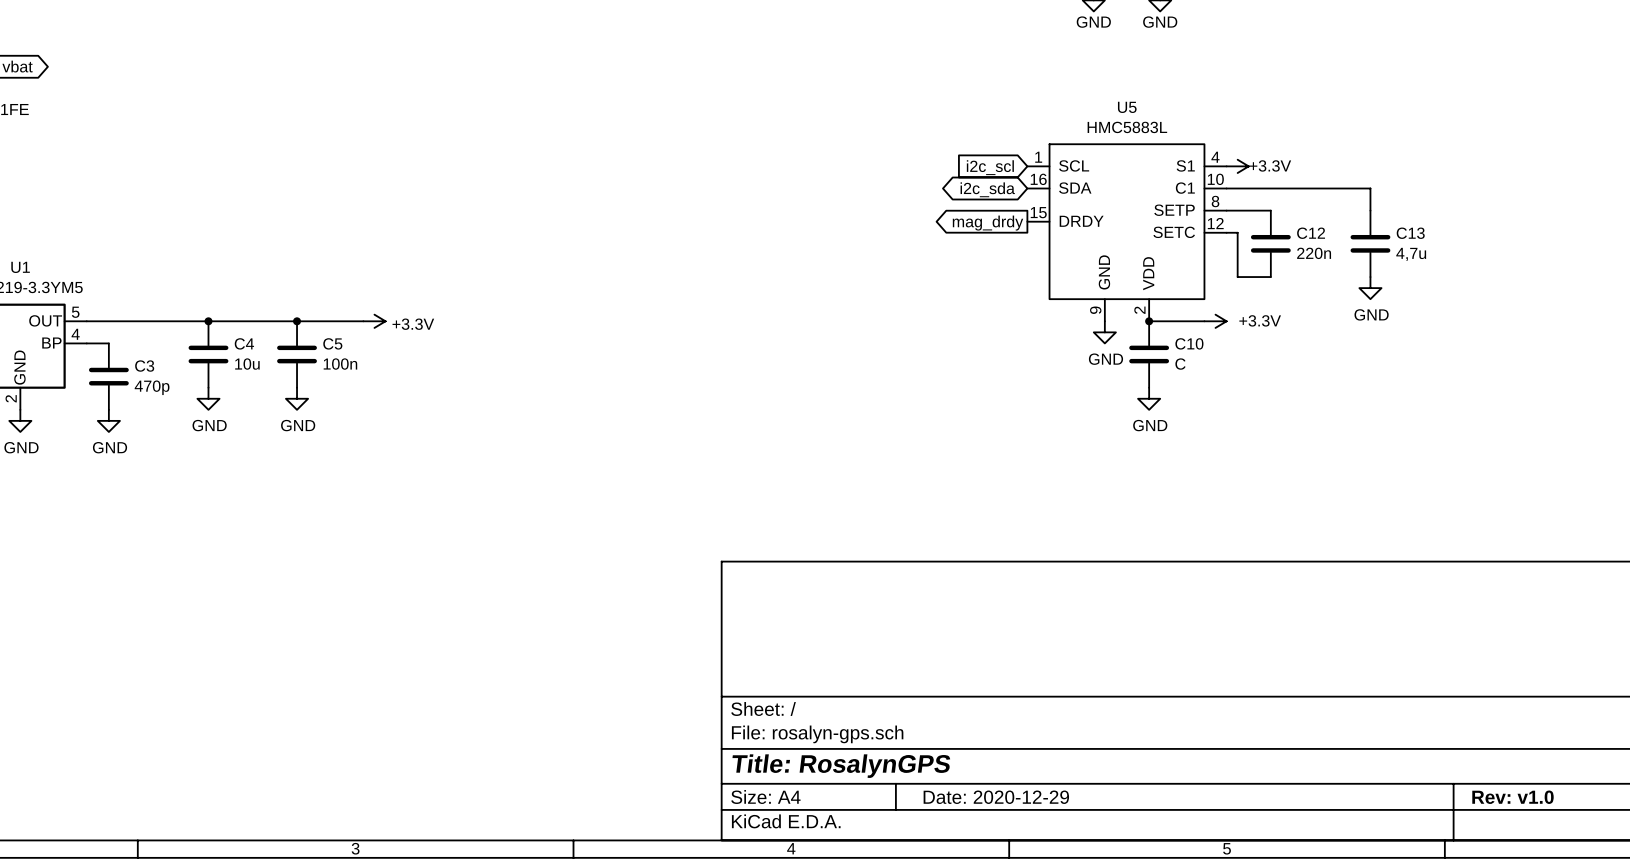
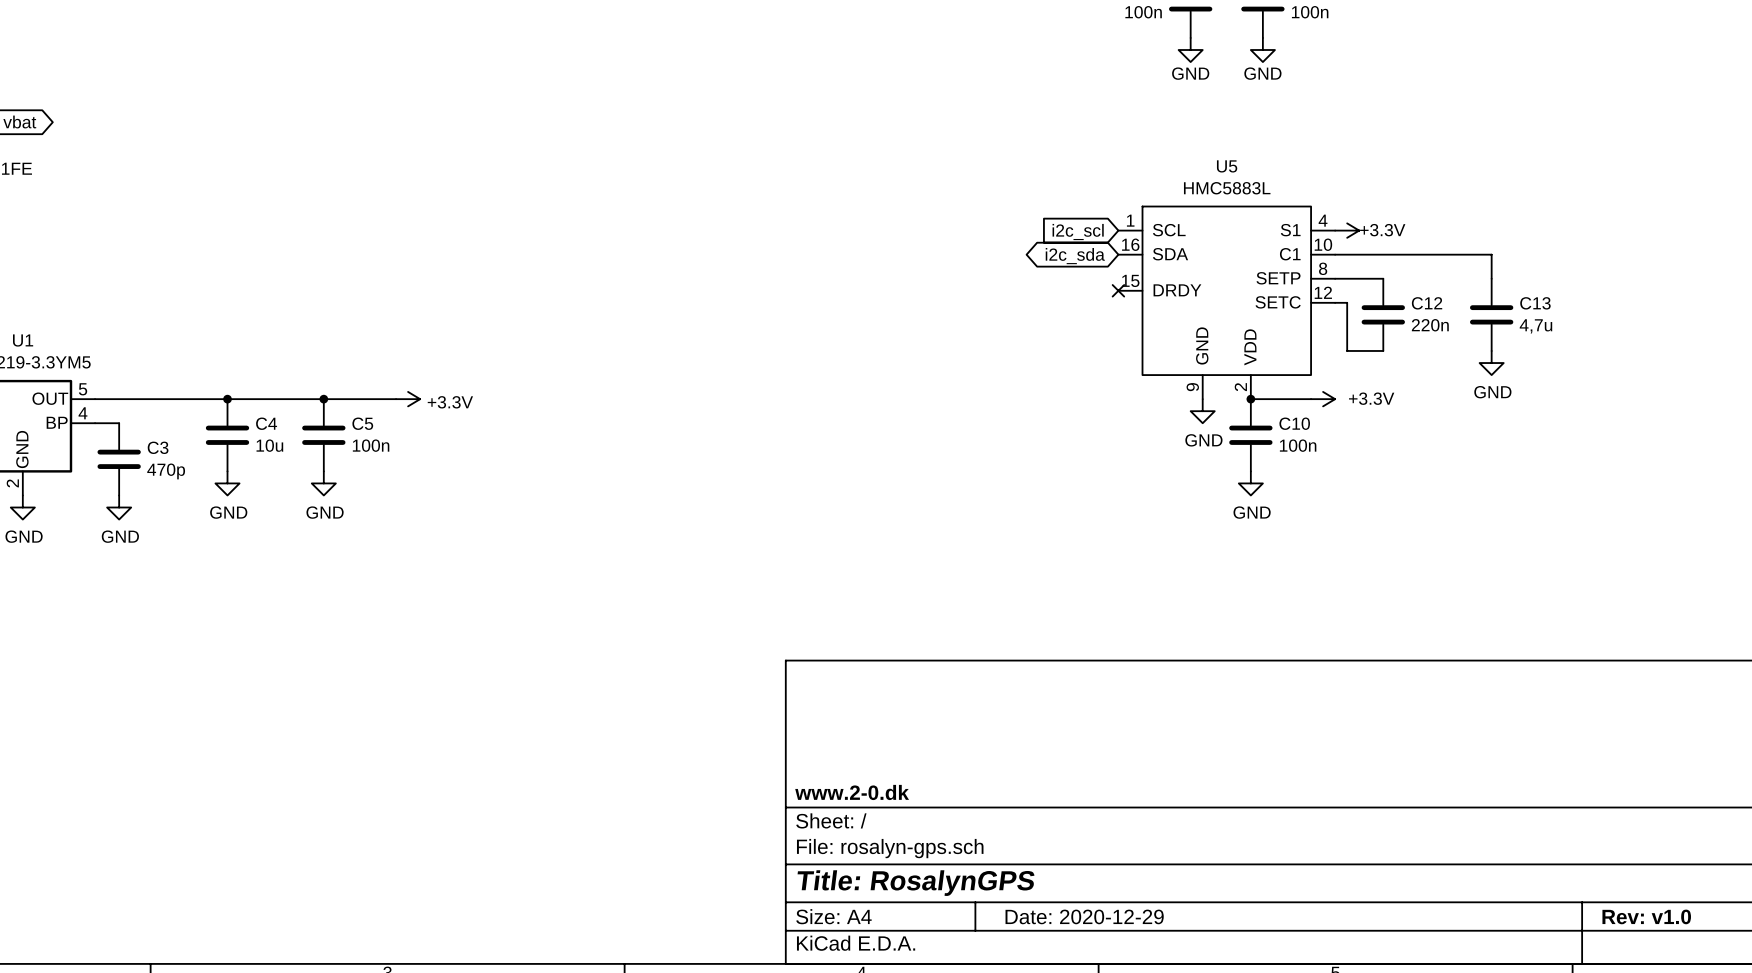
no-connect mark: none -> (1118, 290)
global label: mag_drdy (988, 223) -> none
C10 value: C (1180, 364) -> 100n (1298, 445)
title block: none -> www.2-0.dk (852, 792)

